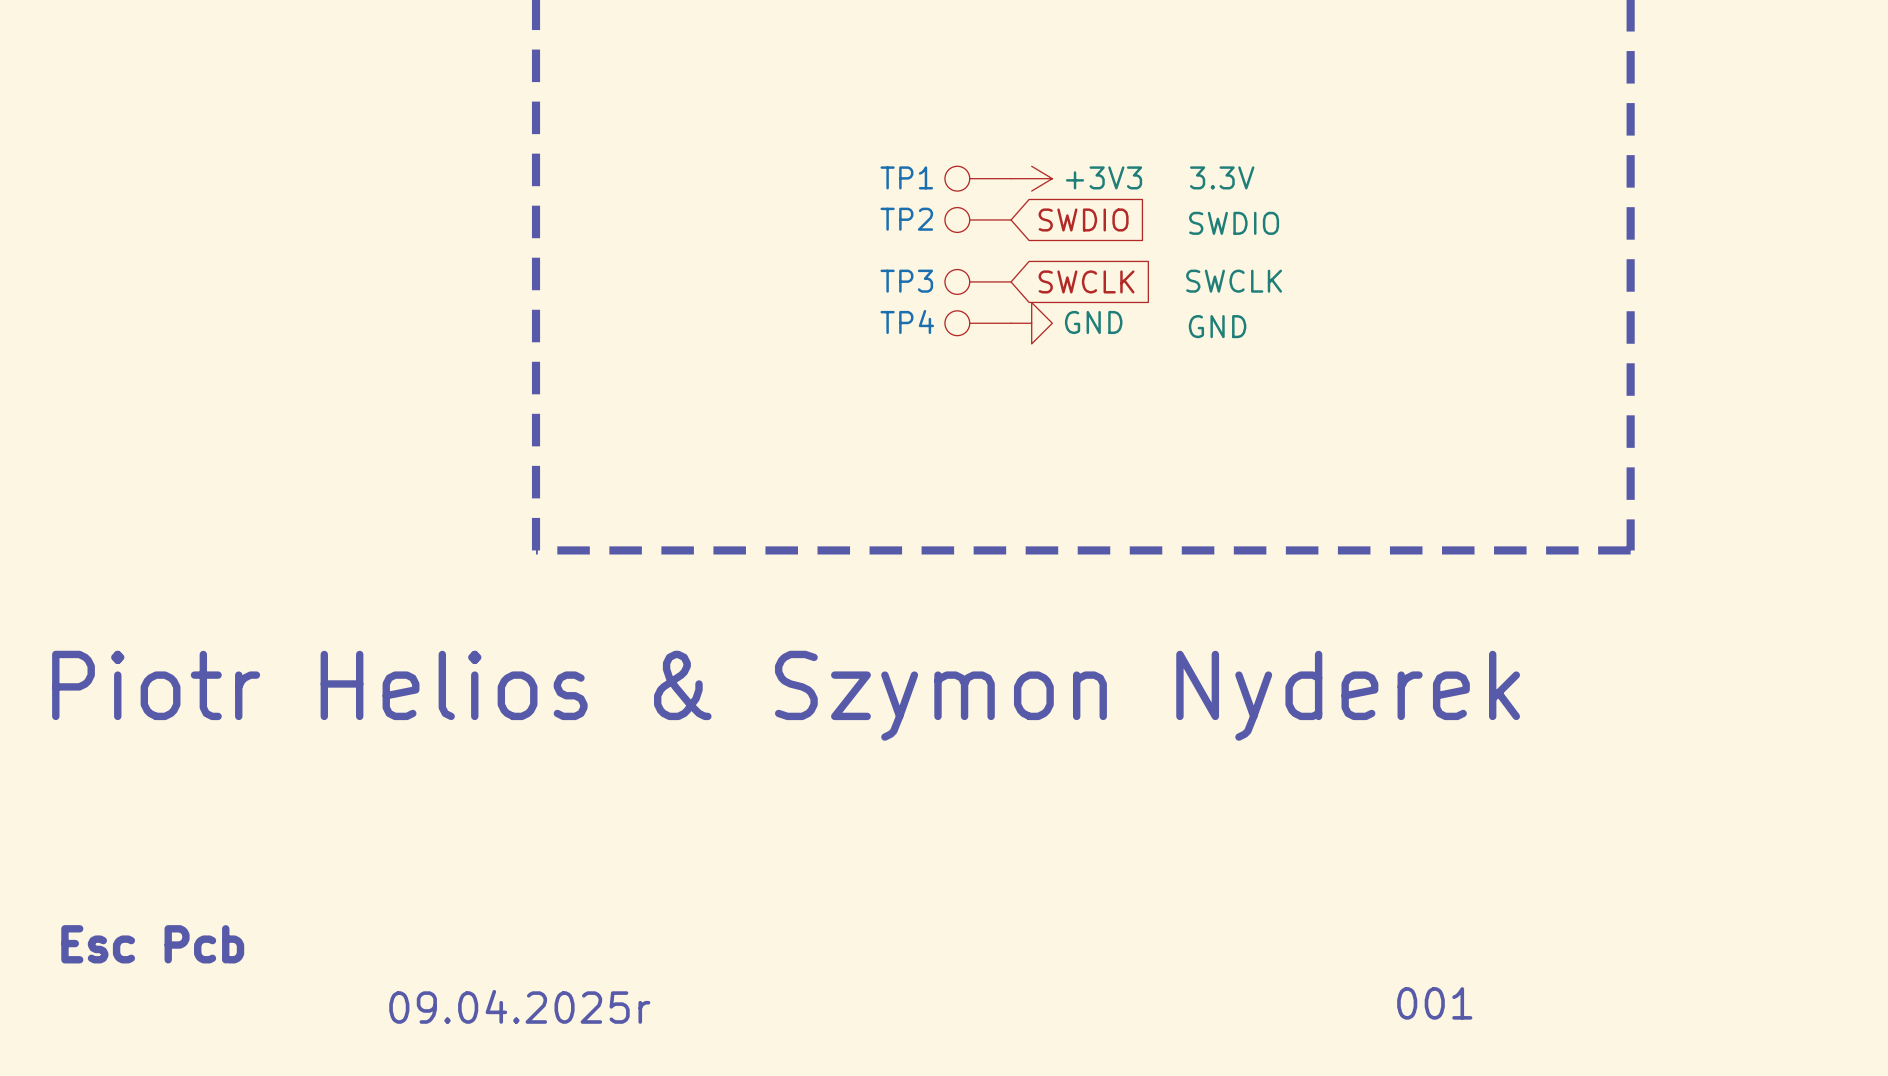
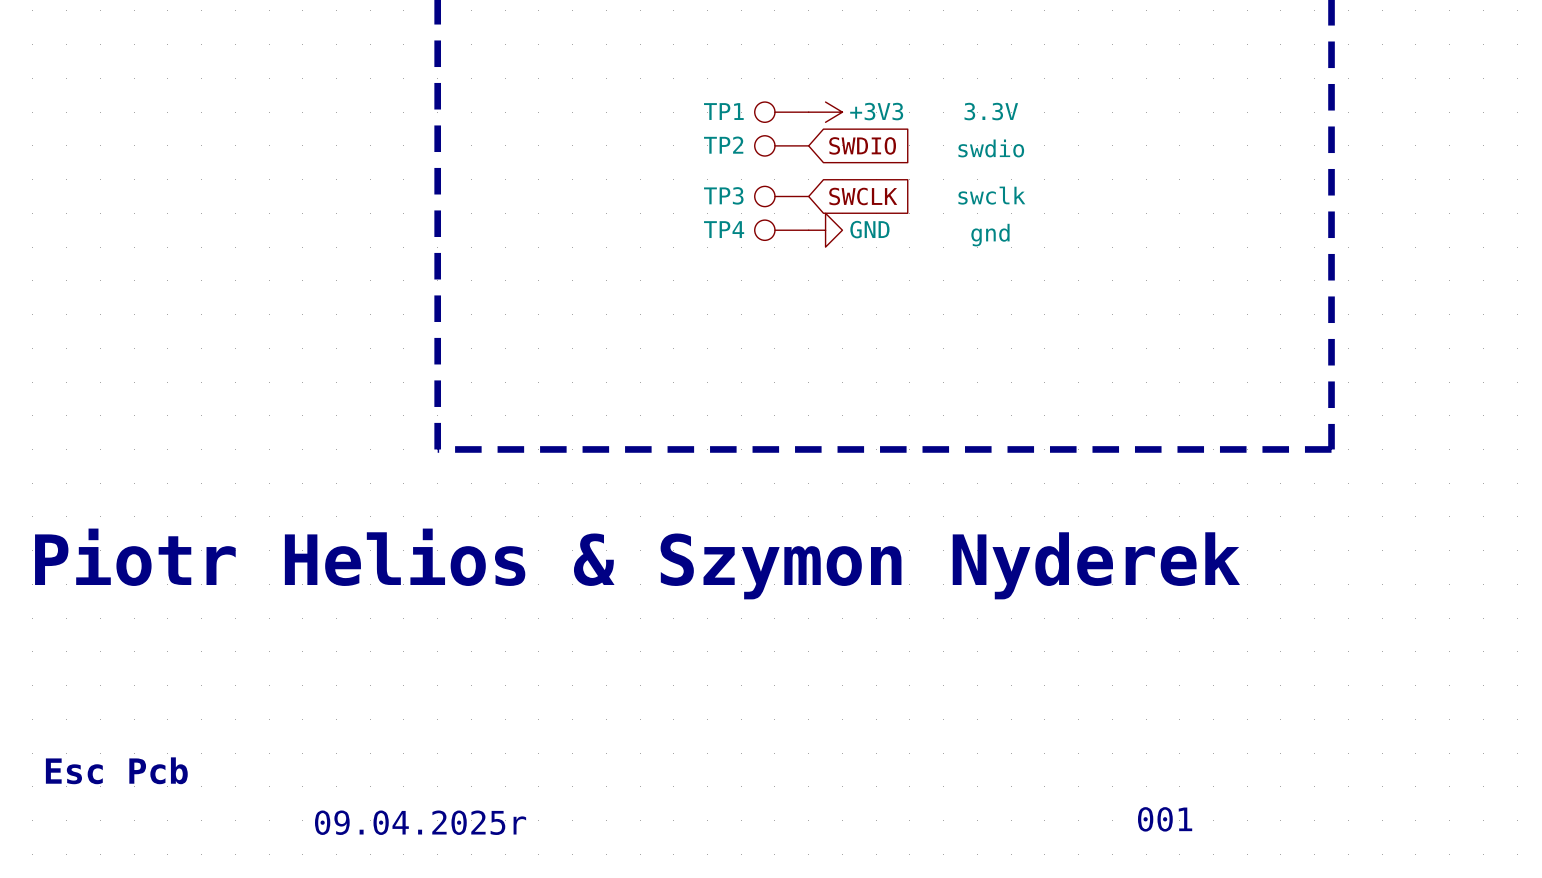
TP1 value position: 3.3V (1222, 177) -> 3.3V (991, 111)
TP1 position: (977, 178) -> (781, 112)
power symbol position: +3V3 (1031, 178) -> +3V3 (825, 112)
TP2 position: (977, 219) -> (781, 145)
global label position: SWDIO (1083, 219) -> SWDIO (862, 145)
TP2 value: SWDIO (1234, 223) -> swdio (991, 148)
TP3 position: (977, 281) -> (781, 196)
global label position: SWCLK (1086, 281) -> SWCLK (863, 196)
TP3 value: SWCLK (1234, 281) -> swclk (991, 195)
TP4 position: (977, 323) -> (781, 230)
power symbol position: GND (1031, 323) -> GND (825, 230)
TP4 value: GND (1217, 326) -> gnd (990, 235)

